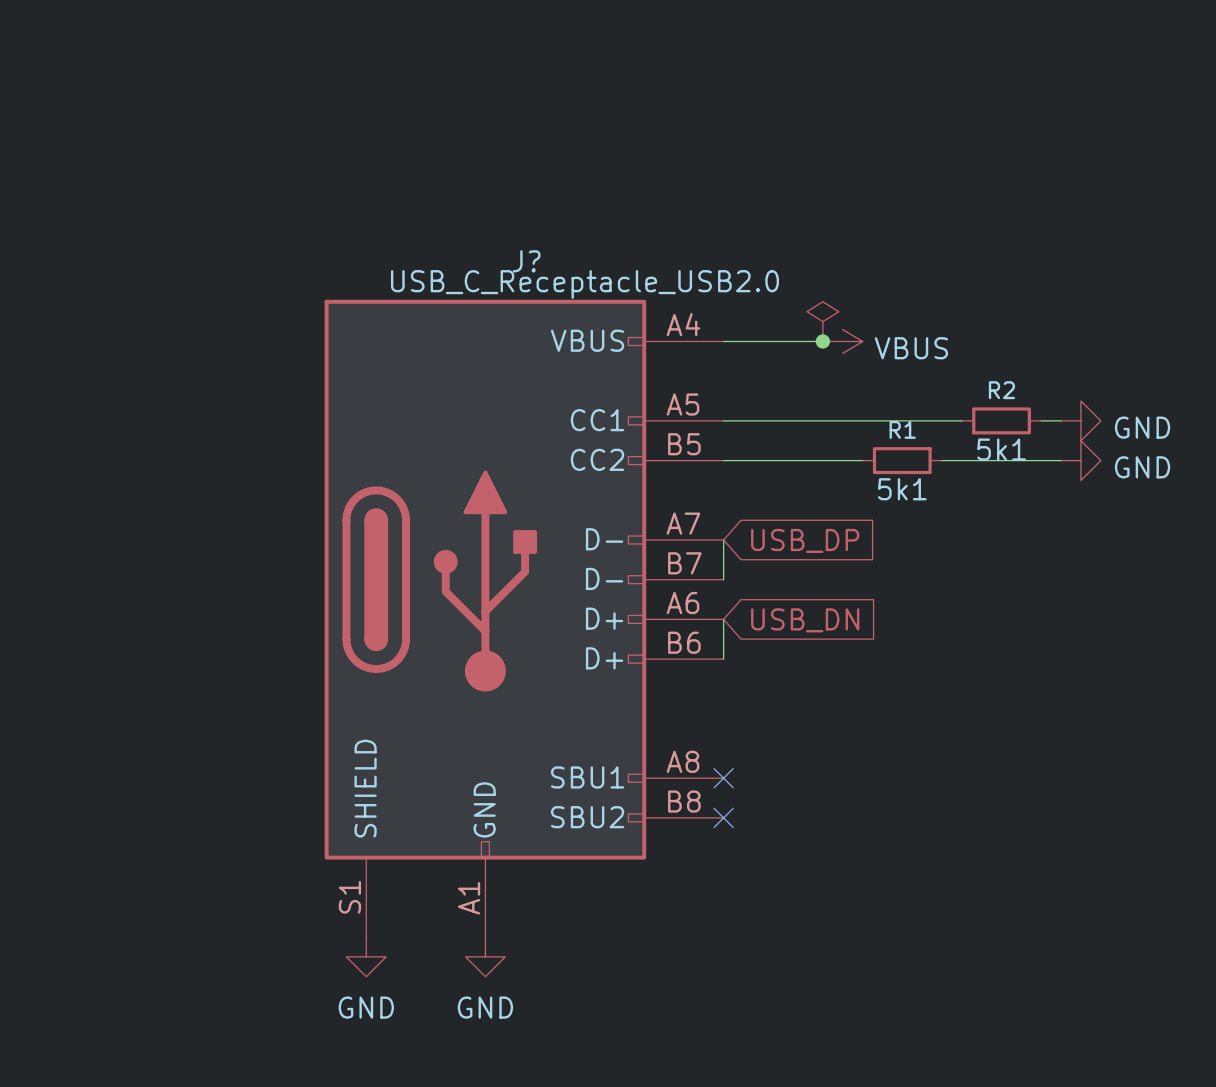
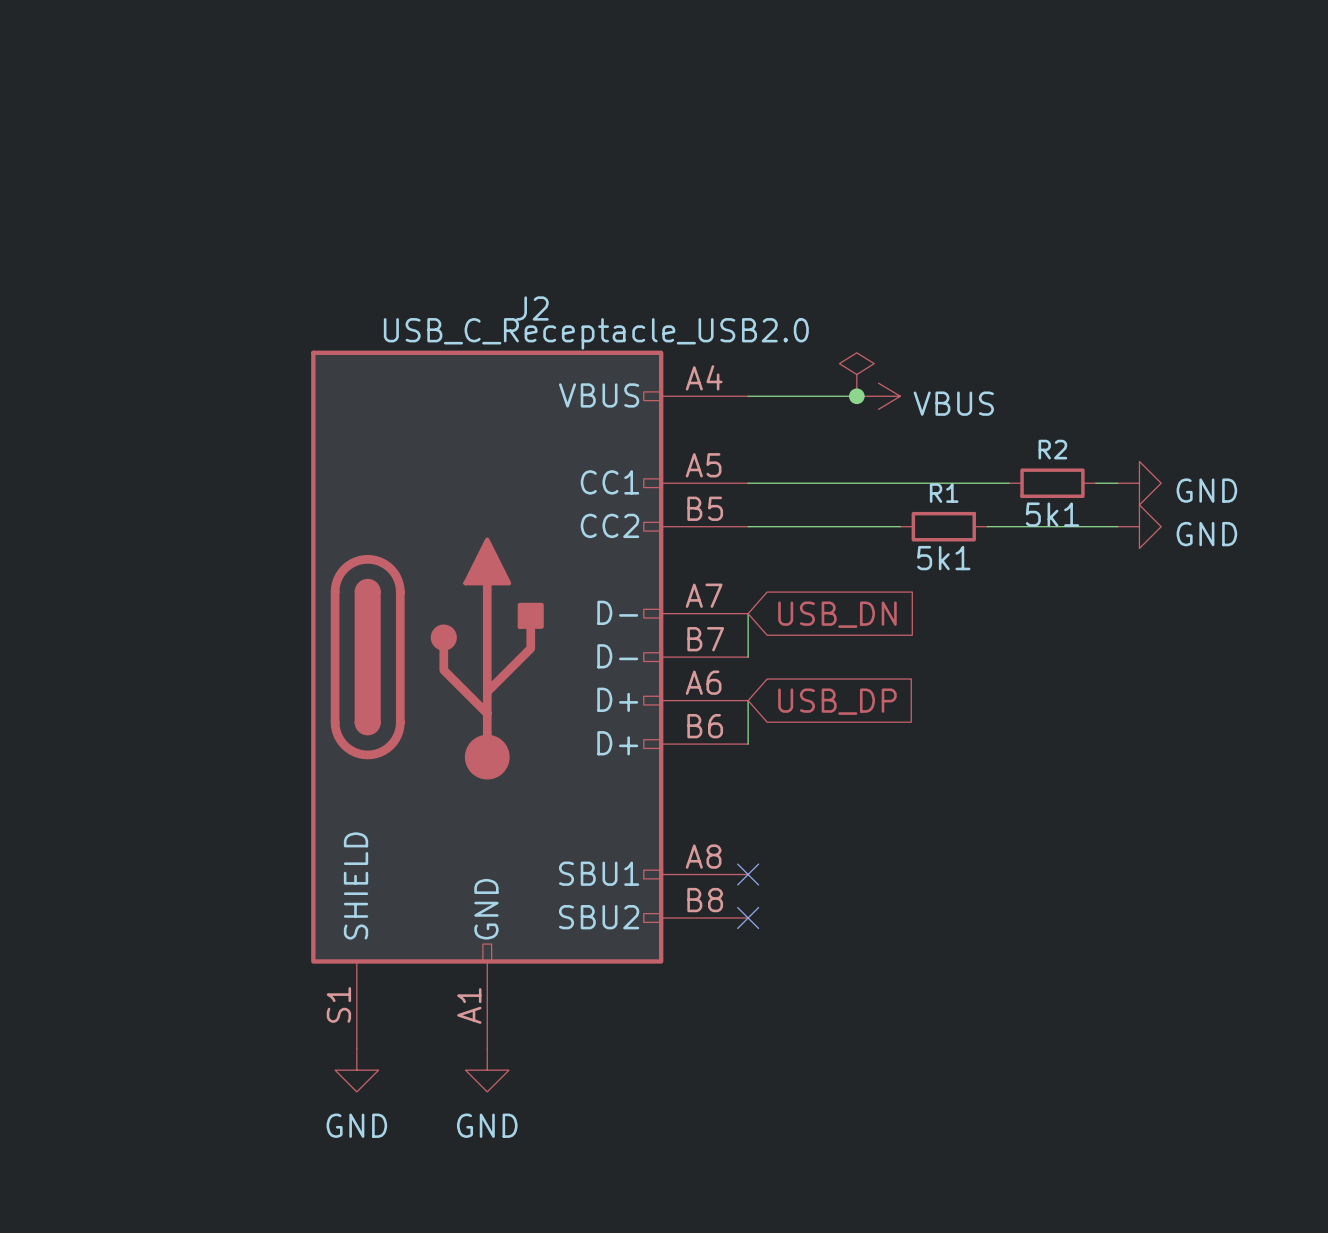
J? name: J? (526, 261) -> J2 (532, 308)
global label: USB_DP (805, 540) -> USB_DN (837, 614)
global label: USB_DN (805, 620) -> USB_DP (837, 701)

